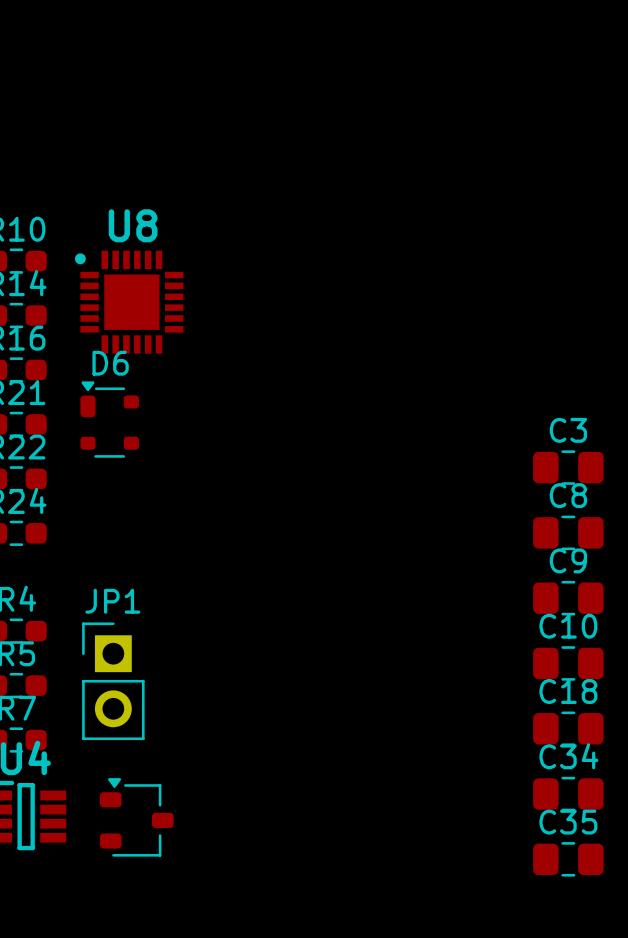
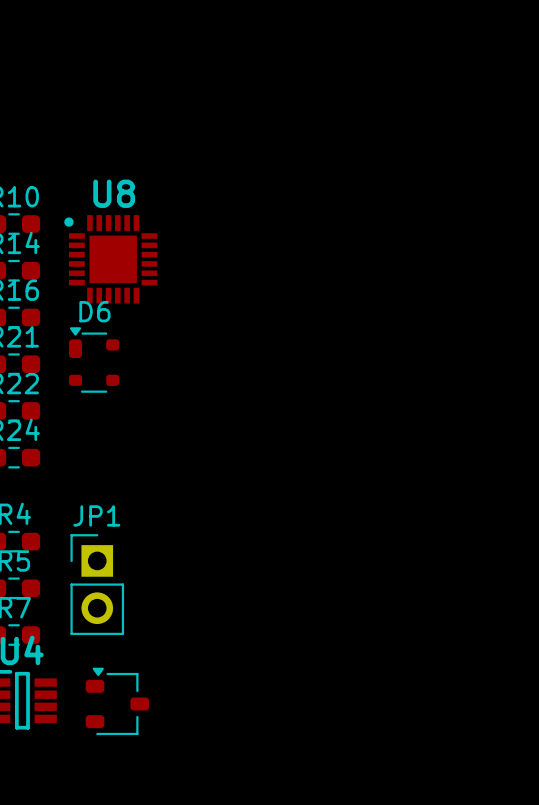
C3: (568, 467) -> none
C8: (568, 532) -> none
C9: (568, 598) -> none
C10: (568, 663) -> none
C18: (568, 728) -> none
C34: (568, 794) -> none
C35: (568, 859) -> none

